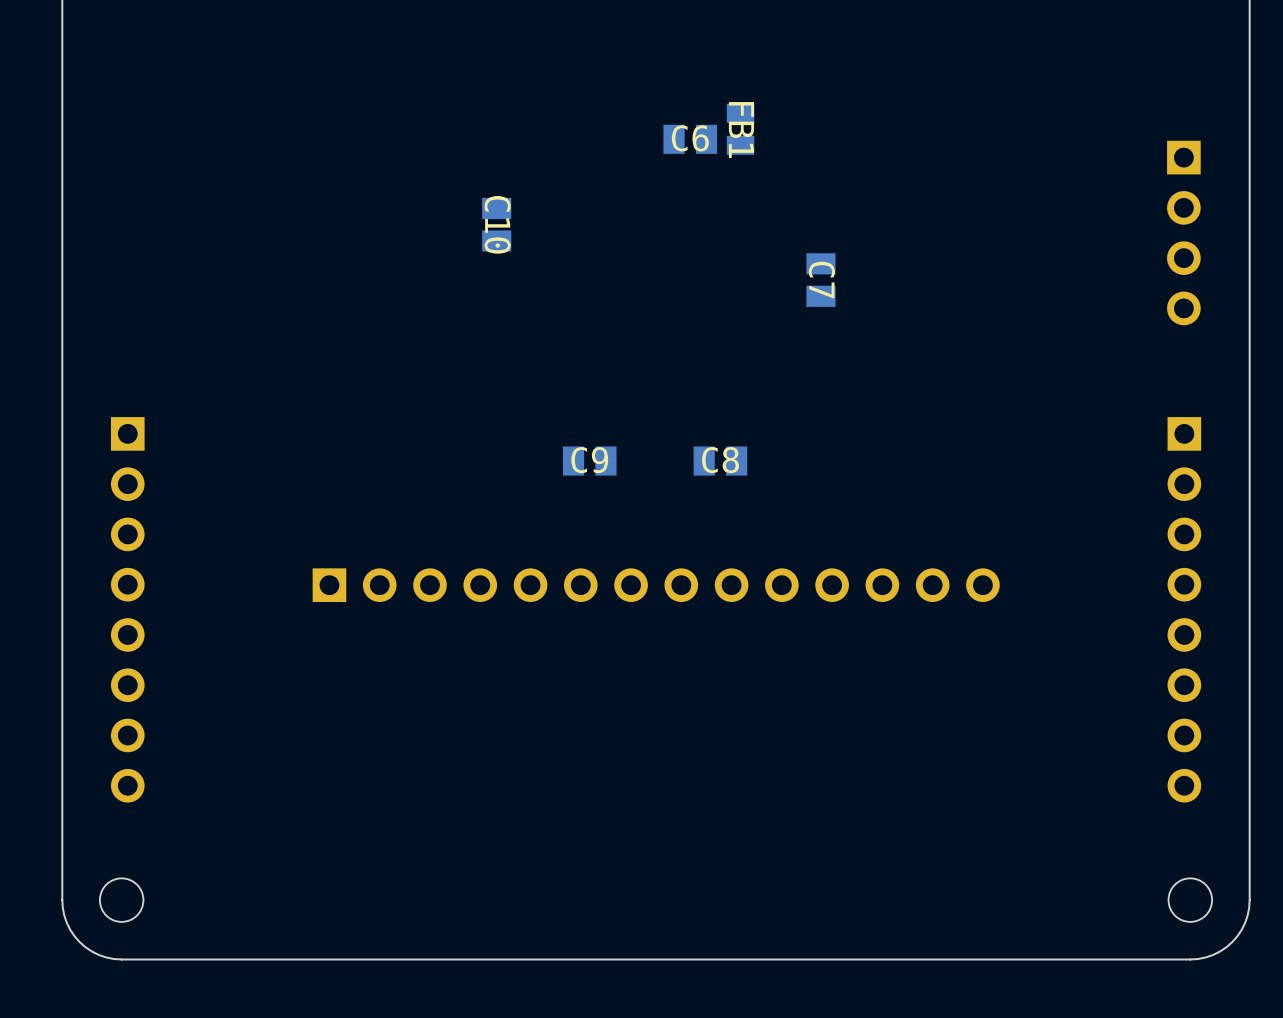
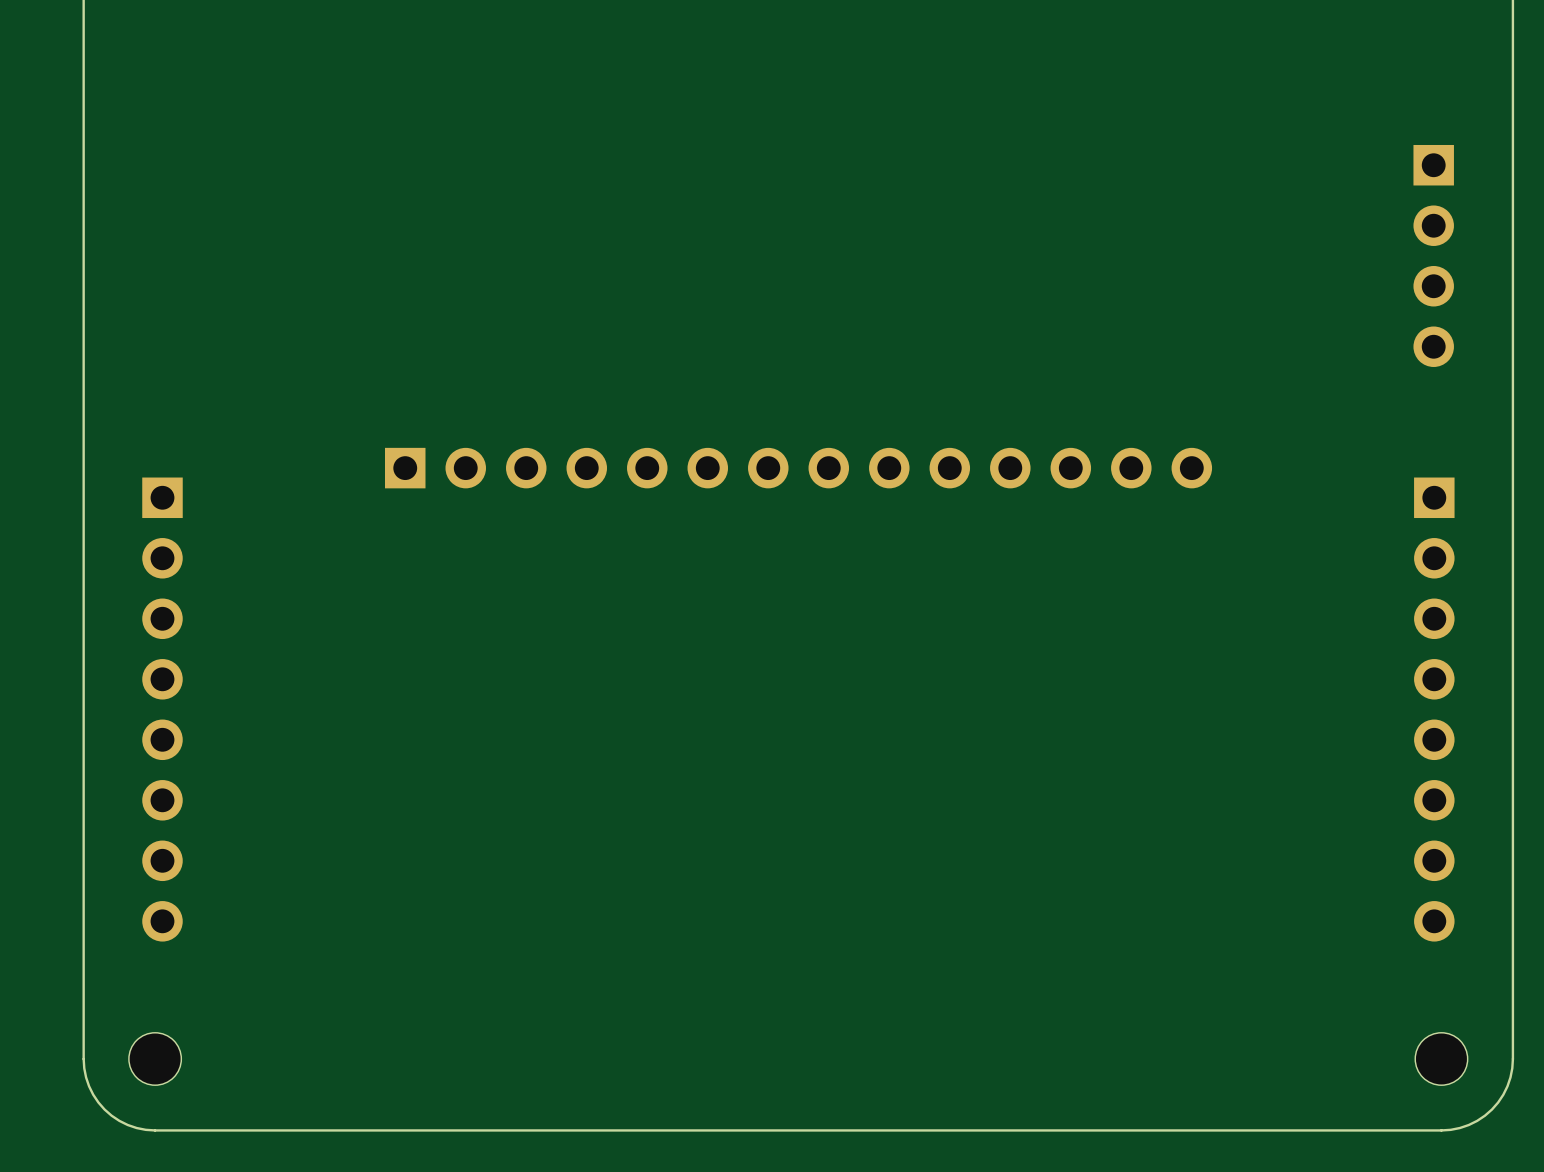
FB1: (740, 129) -> none
C6: (690, 139) -> none
C10: (496, 224) -> none
C7: (820, 280) -> none
C9: (589, 461) -> none
C8: (720, 461) -> none
part position: (656, 585) -> (798, 468)

